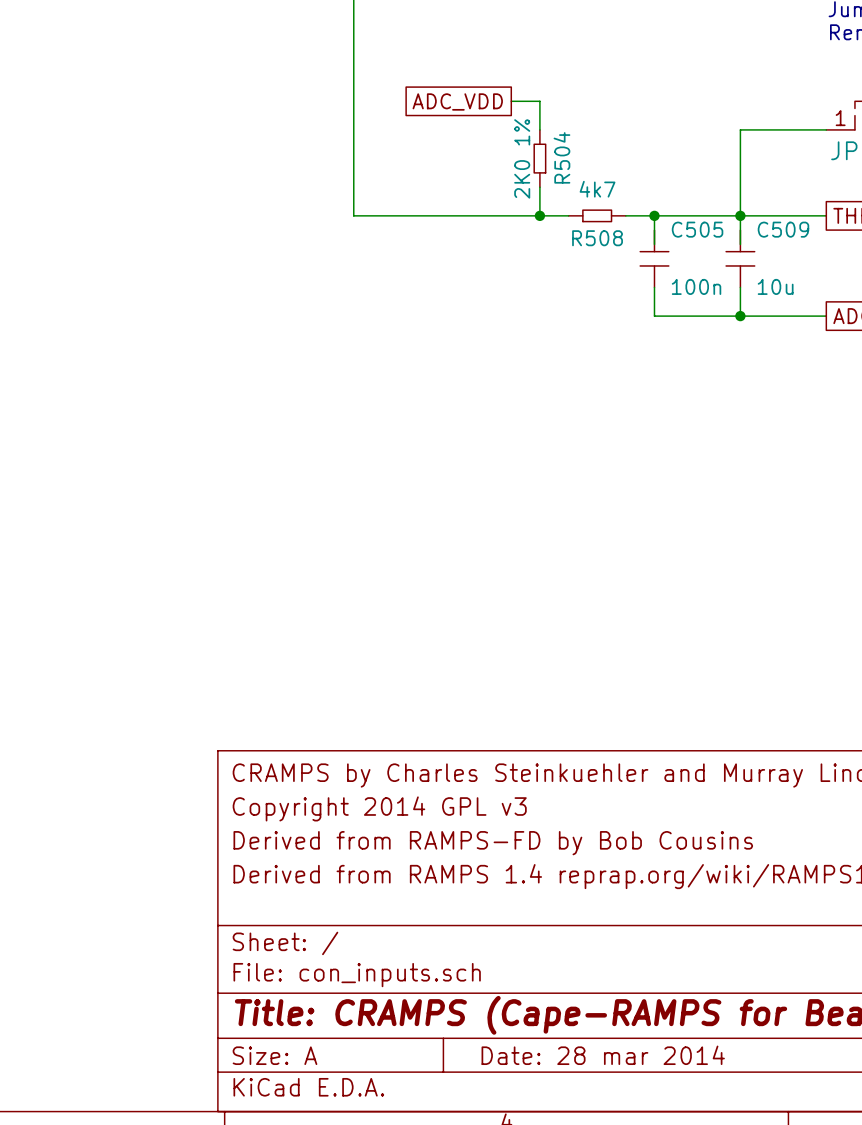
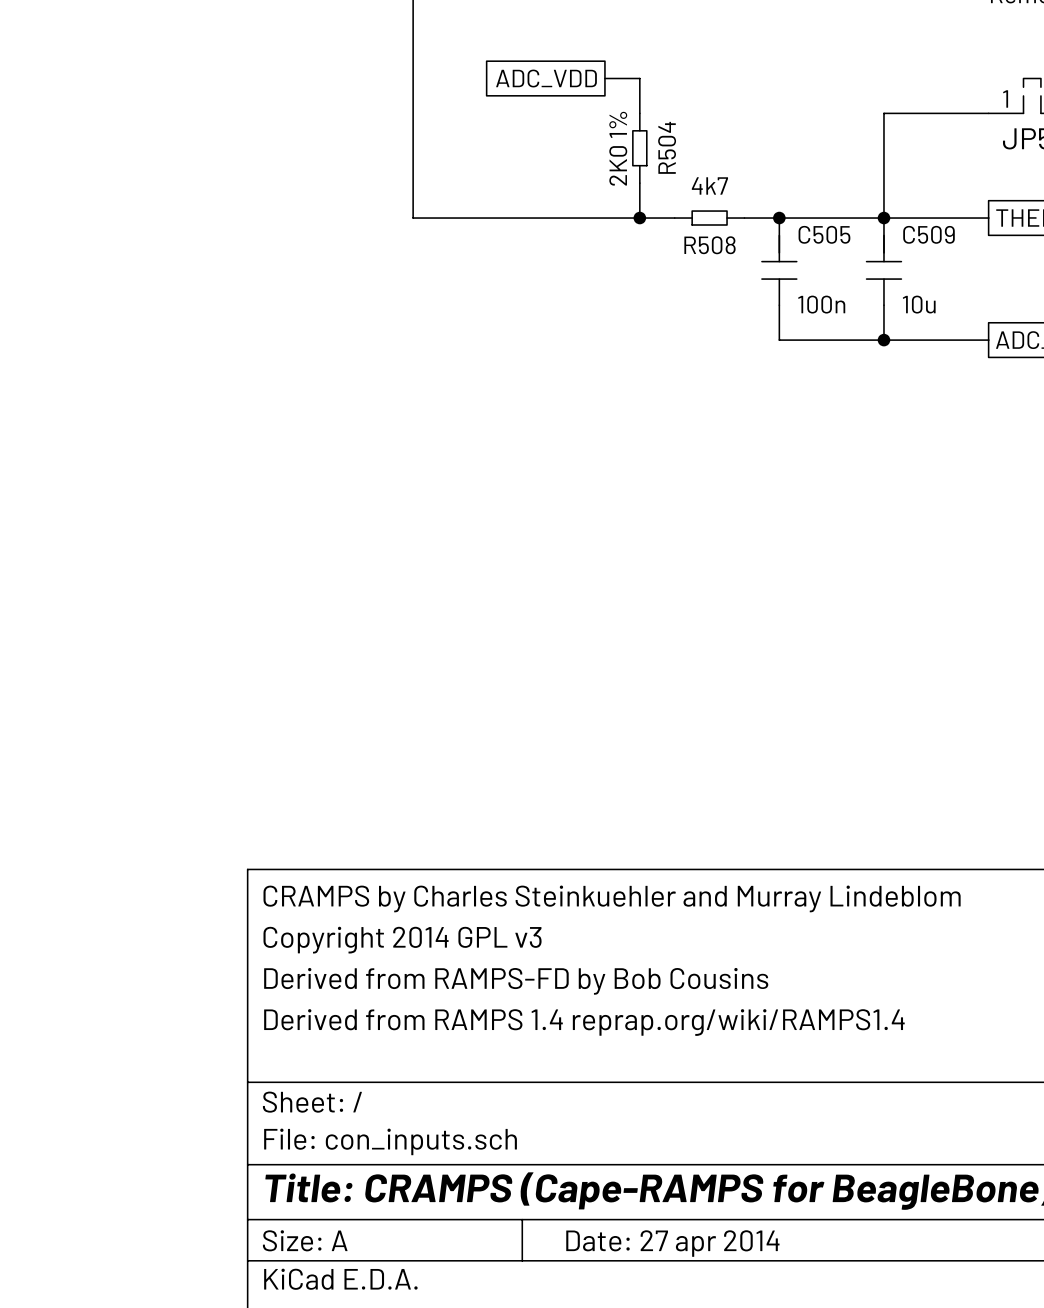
title block: Date: 28 mar 2014 (603, 1055) -> Date: 27 apr 2014 (672, 1243)

